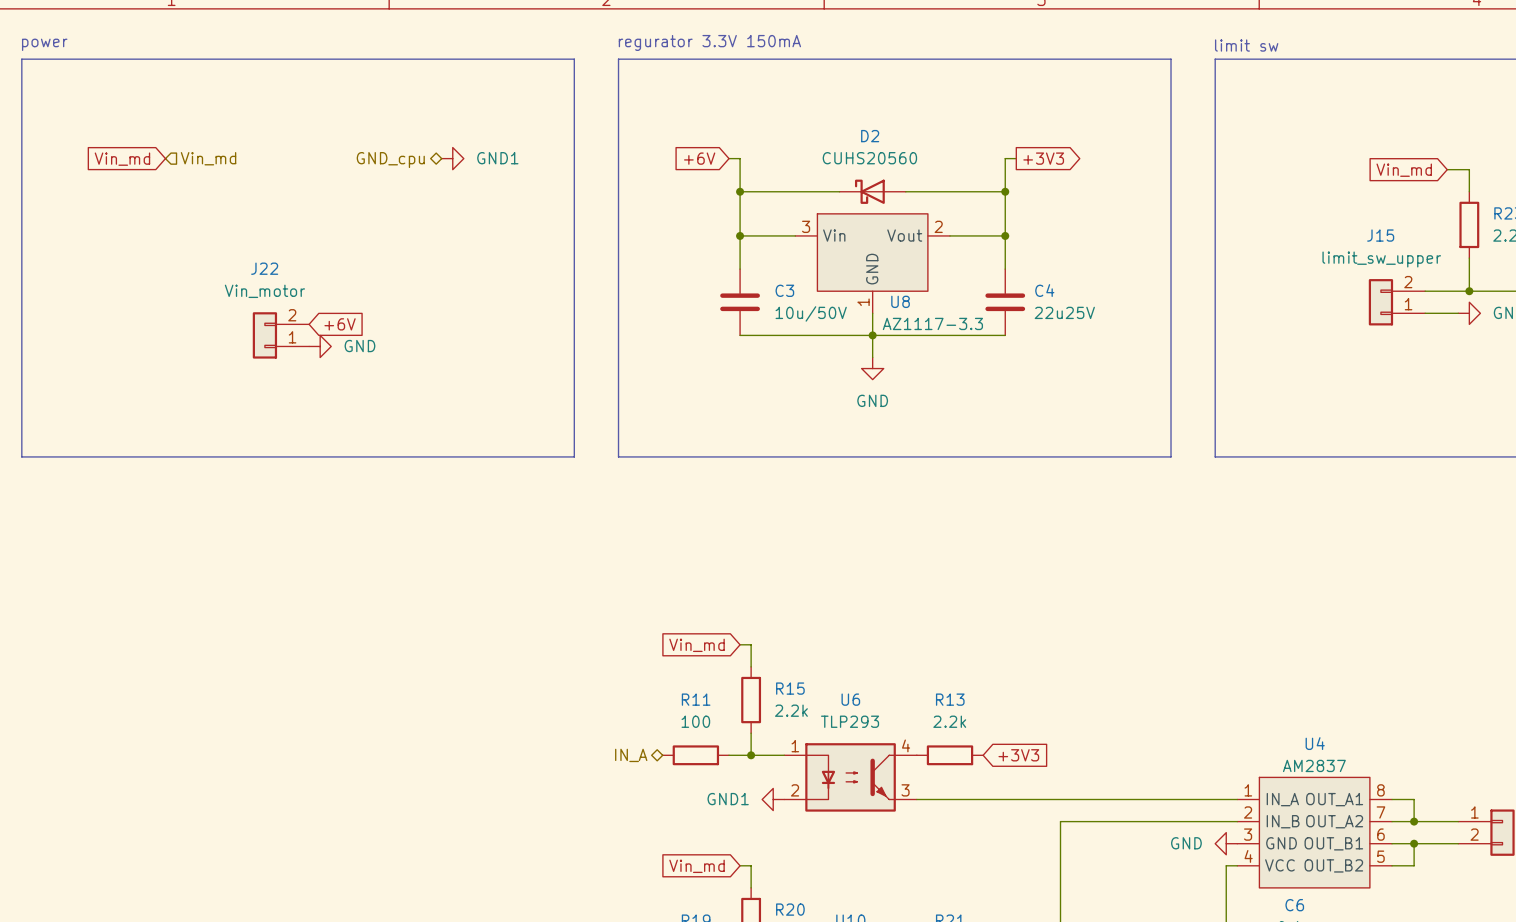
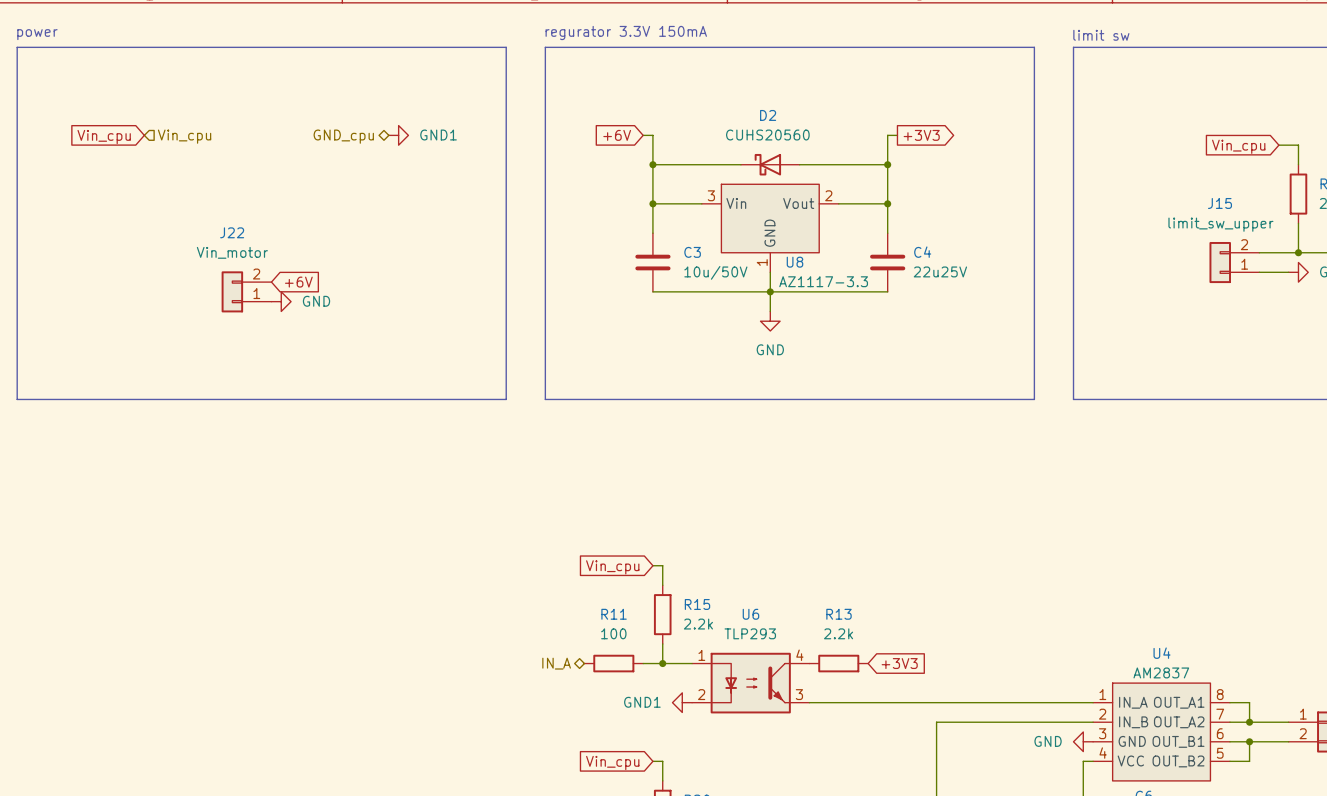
hierarchical label: Vin_md (208, 158) -> Vin_cpu (184, 136)
global label: Vin_md (122, 159) -> Vin_cpu (104, 137)
global label: Vin_md (1404, 170) -> Vin_cpu (1238, 146)
global label: Vin_md (697, 645) -> Vin_cpu (612, 567)
global label: Vin_md (697, 866) -> Vin_cpu (612, 762)

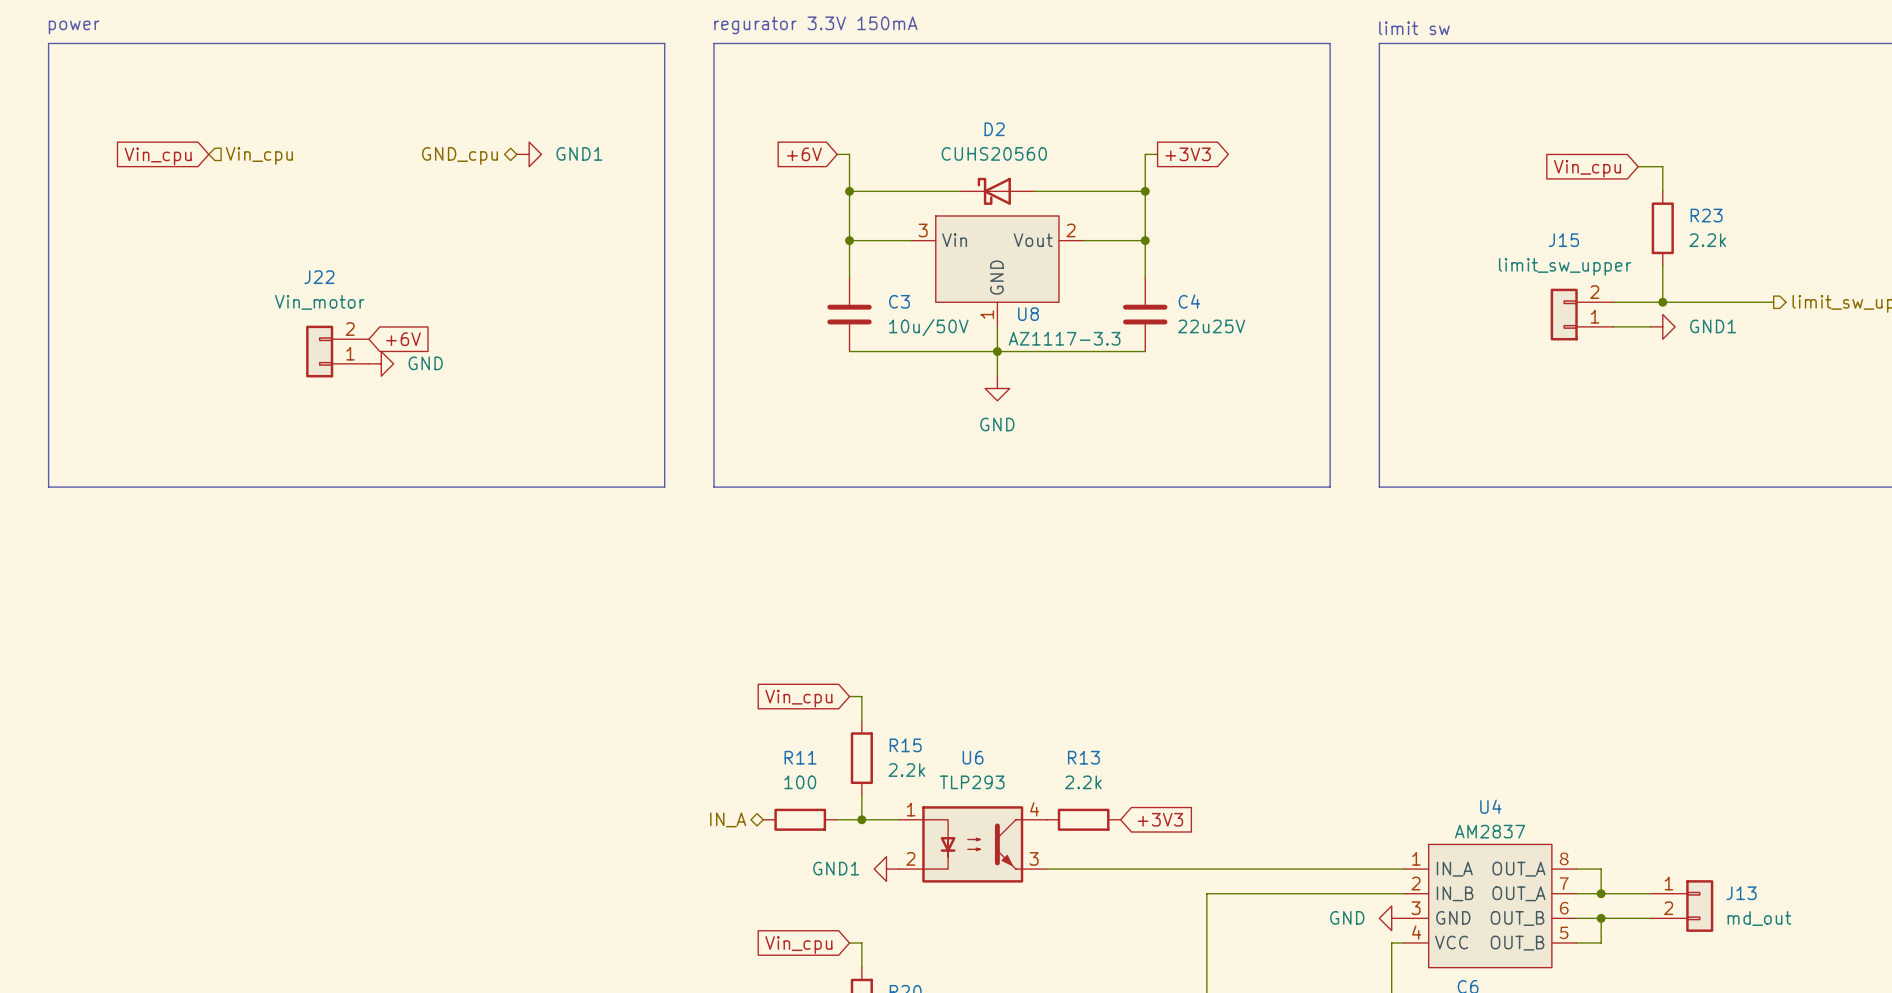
U4 pin number: 8 (1220, 694) -> ８ (1564, 858)
U4 pin name: OUT_A1 (1179, 702) -> OUT_A (1518, 869)
U4 pin number: 7 (1220, 714) -> ７ (1564, 883)
U4 pin name: OUT_A2 (1179, 722) -> OUT_A (1518, 893)
U4 pin number: 6 (1220, 733) -> ６ (1564, 908)
U4 pin name: OUT_B1 (1178, 741) -> OUT_B (1517, 918)
U4 pin number: 5 (1220, 753) -> ５ (1563, 932)
U4 pin name: OUT_B2 (1178, 761) -> OUT_B (1517, 943)

